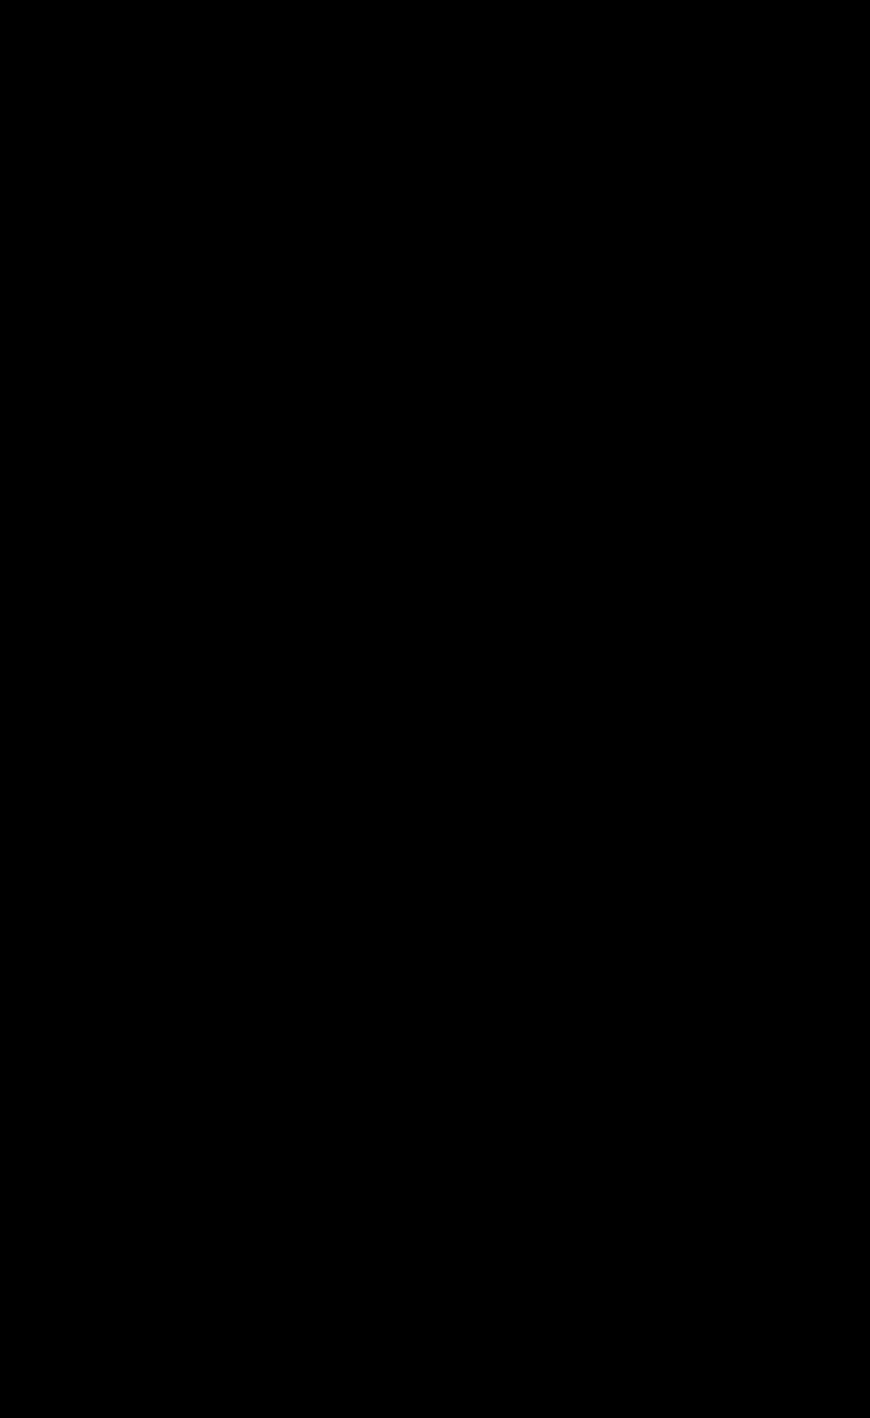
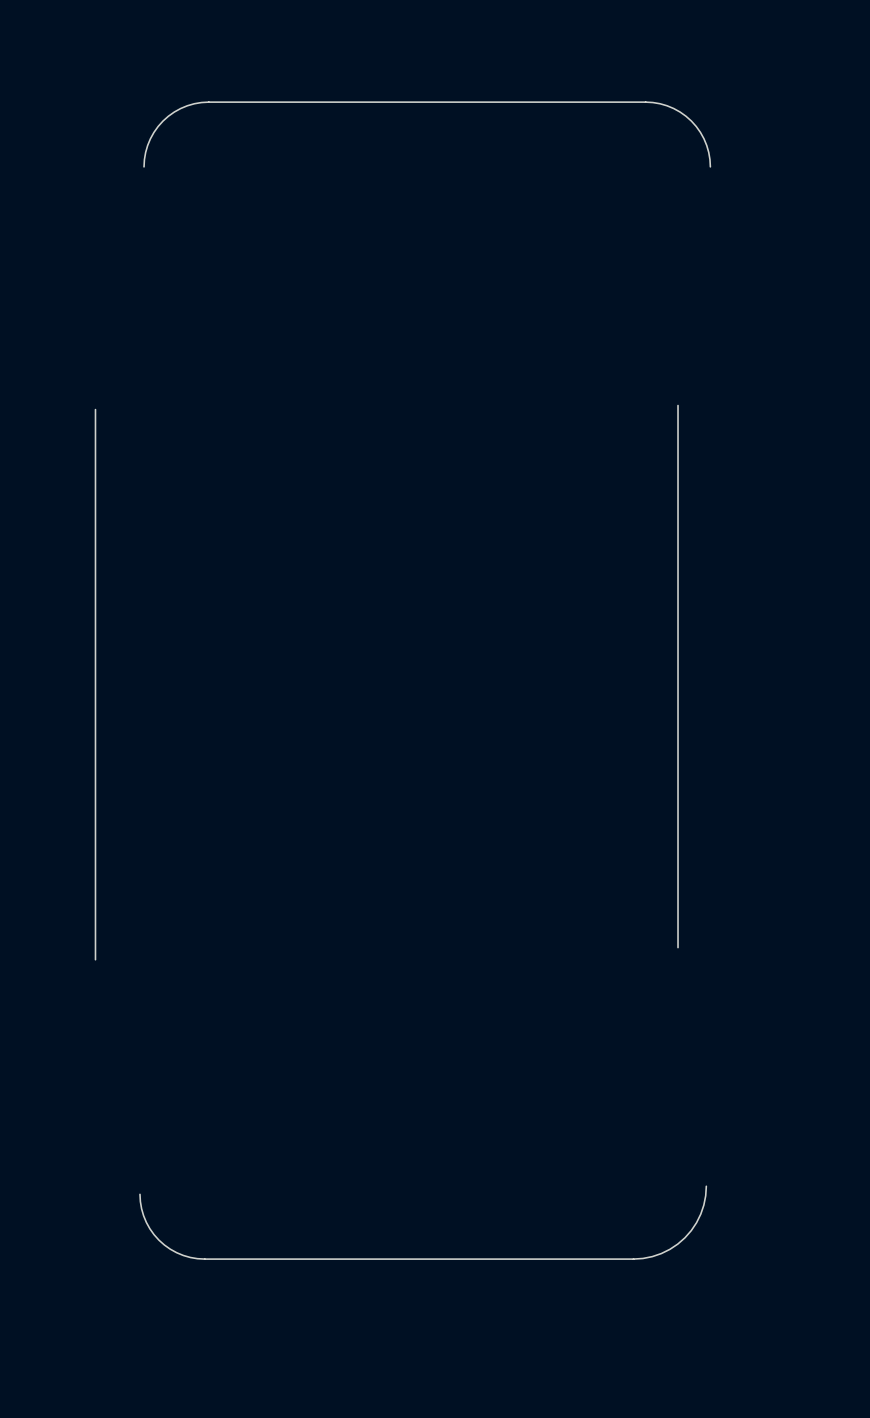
board edge: none -> (144, 166) (145, 152) (150, 138) (162, 121) (180, 108) (194, 103) (208, 102) (652, 102) (673, 108) (691, 121) (703, 138) (708, 152) (710, 166)
board edge: none -> (678, 405) (678, 947)
board edge: none -> (95, 409) (95, 959)
board edge: none -> (706, 1186) (700, 1214) (685, 1237) (661, 1253) (633, 1259) (197, 1258) (176, 1252) (164, 1244) (154, 1234) (143, 1215) (139, 1194)

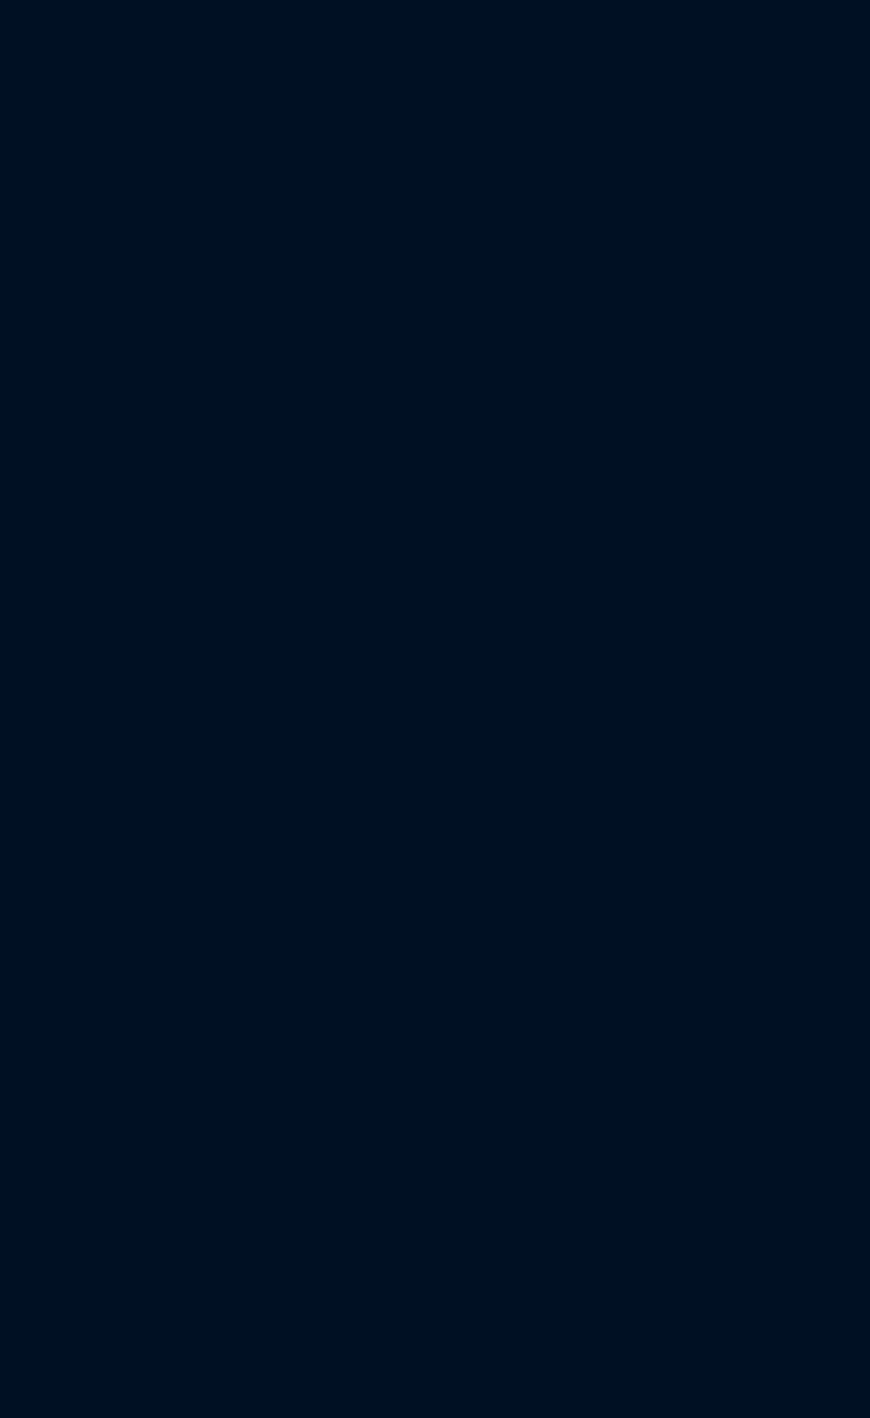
board edge: (144, 166) (145, 152) (150, 138) (162, 121) (180, 108) (194, 103) (208, 102) (652, 102) (673, 108) (691, 121) (703, 138) (708, 152) (710, 166) -> none
board edge: (678, 405) (678, 947) -> none
board edge: (95, 409) (95, 959) -> none
board edge: (706, 1186) (700, 1214) (685, 1237) (661, 1253) (633, 1259) (197, 1258) (176, 1252) (164, 1244) (154, 1234) (143, 1215) (139, 1194) -> none

